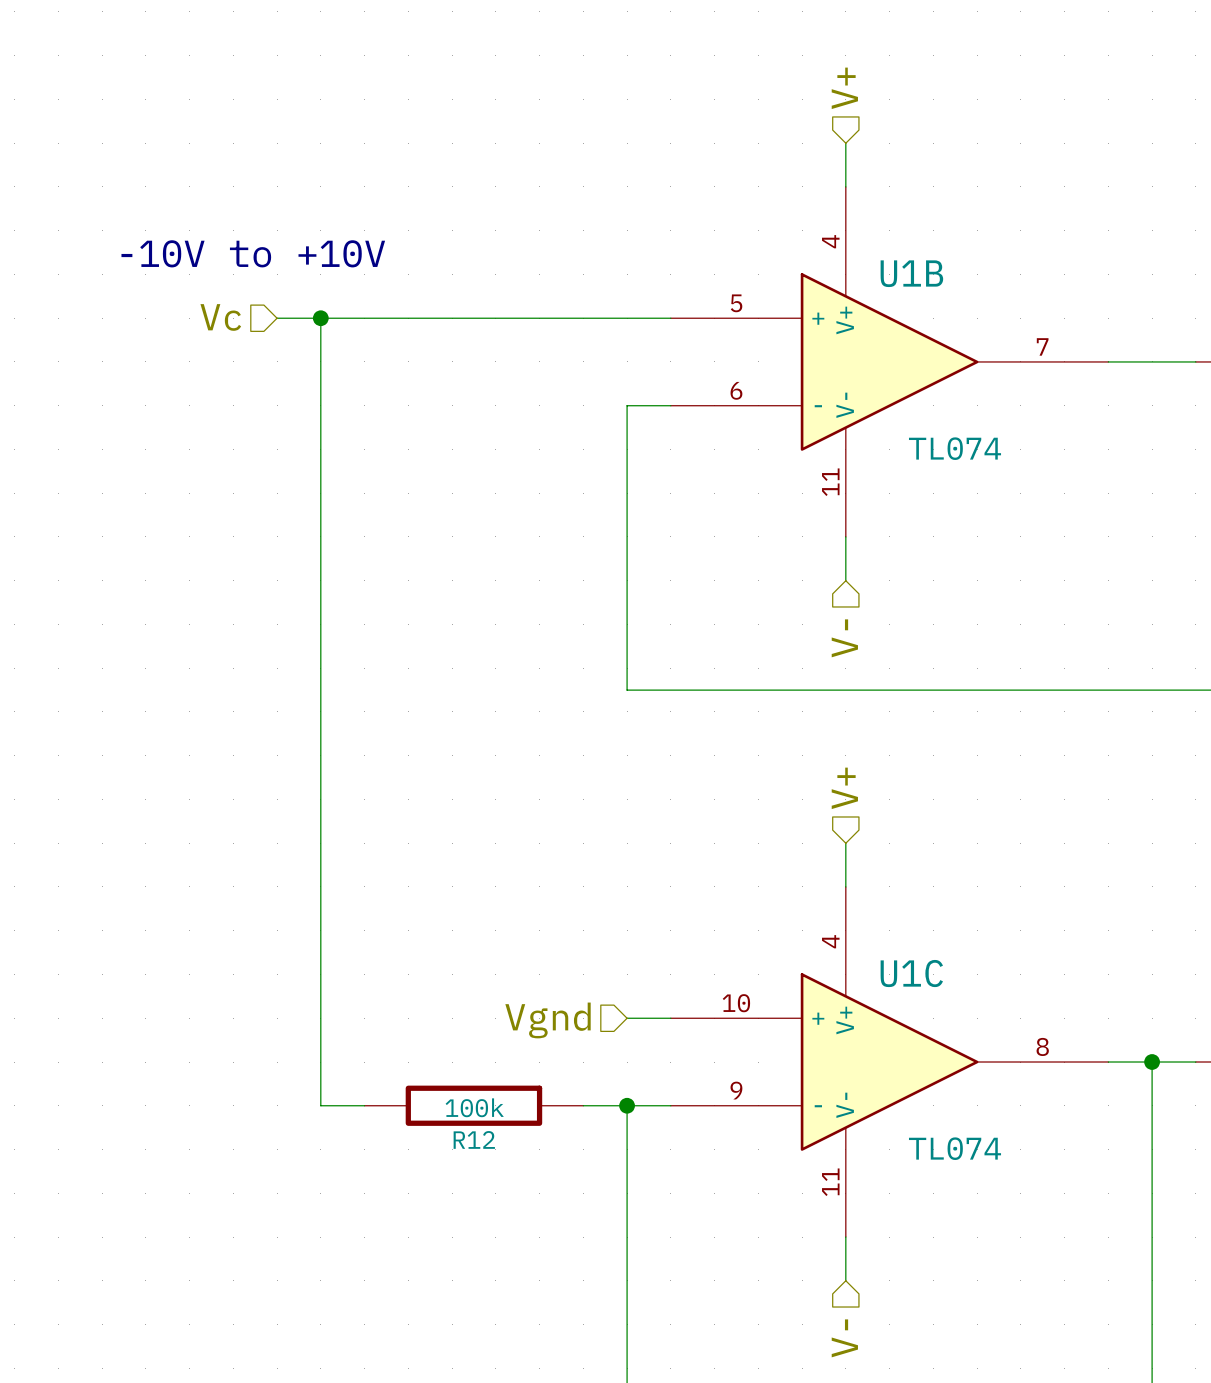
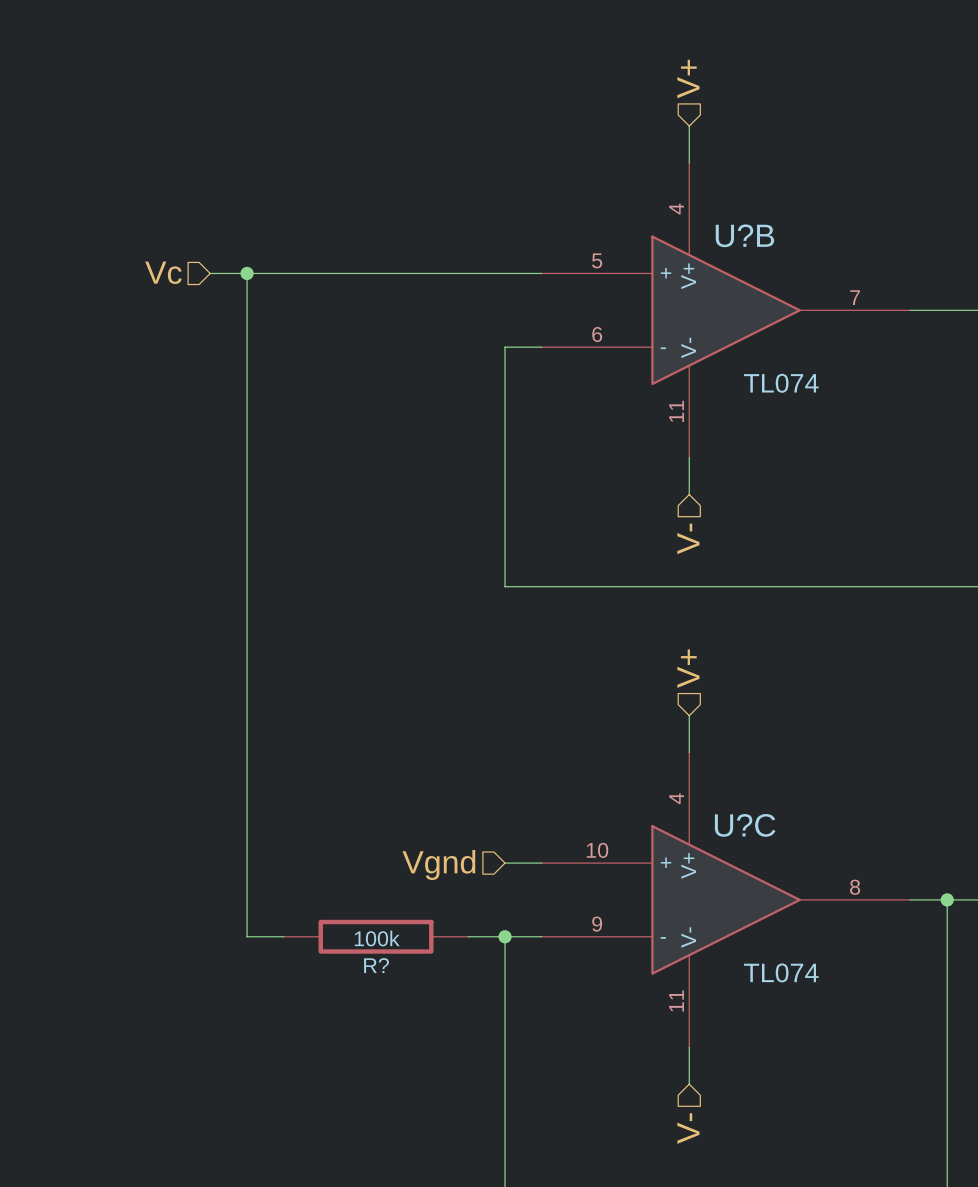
text: -10V to +10V (253, 253) -> none
U1B name: U1B (911, 273) -> U?B (744, 235)
U1C name: U1C (911, 973) -> U?C (745, 825)
R12 name: R12 (474, 1139) -> R? (376, 965)

